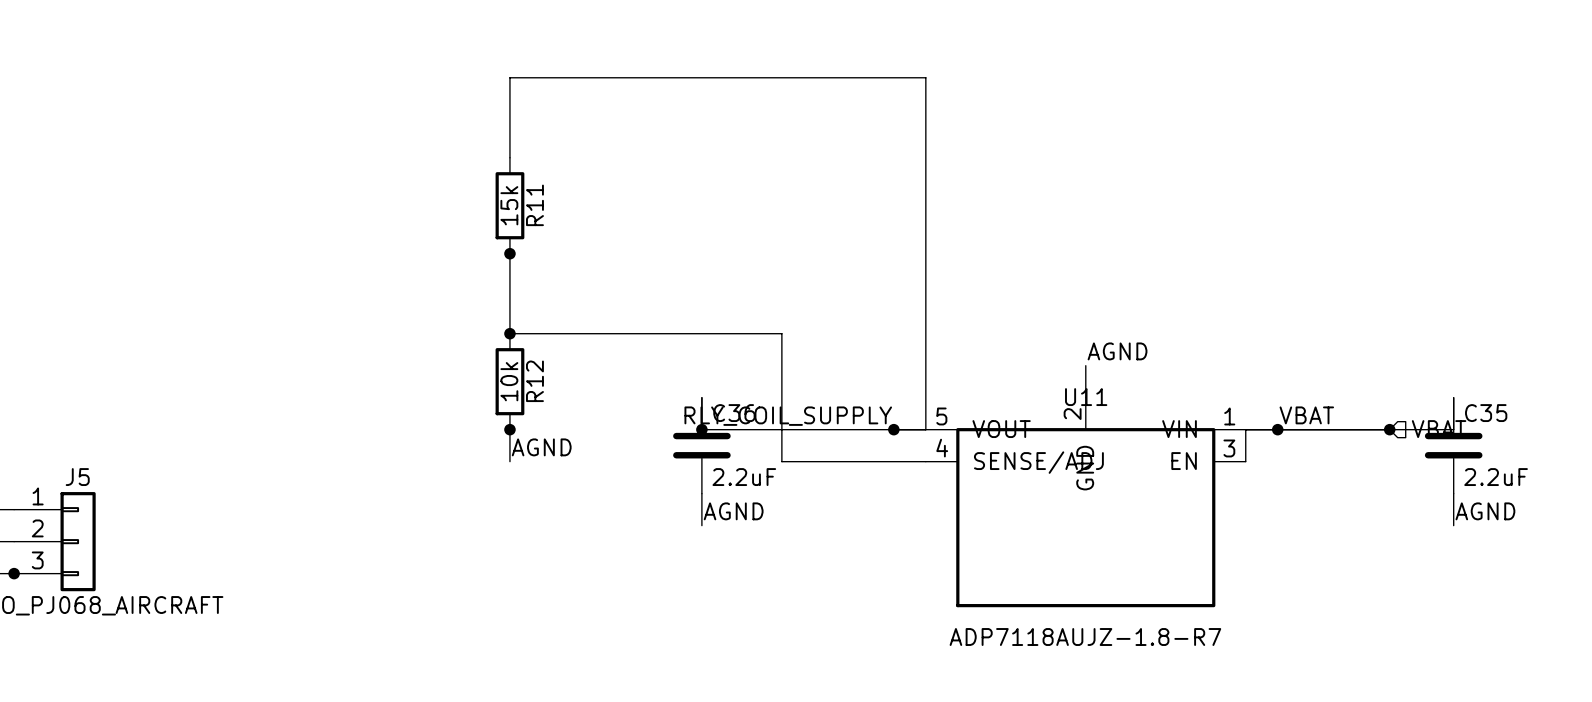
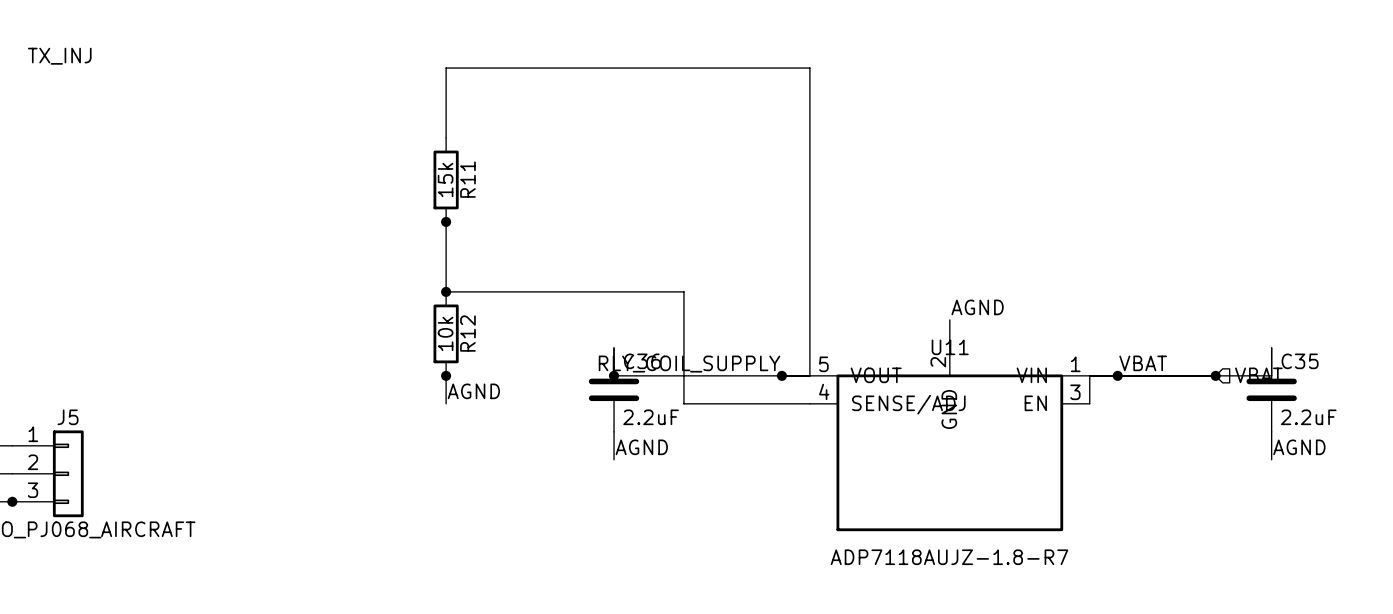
label: none -> TX_INJ (59, 56)

